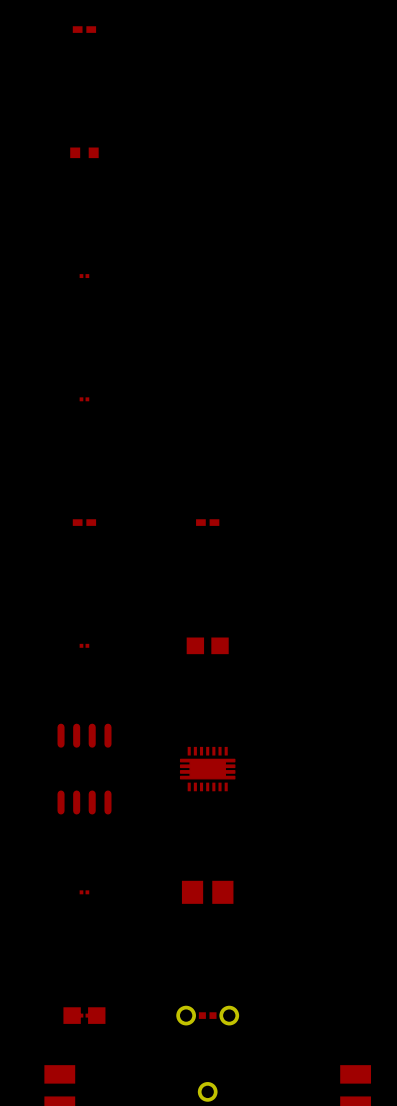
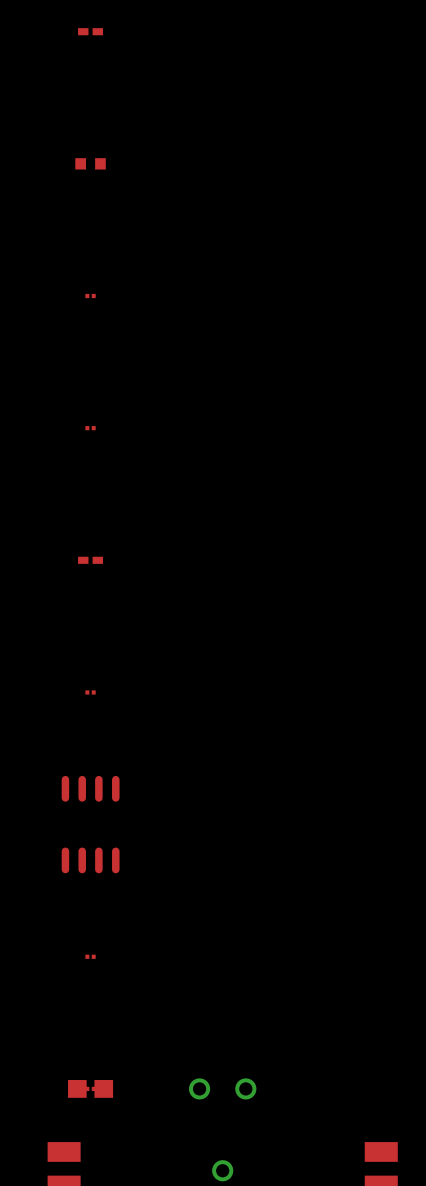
part: (207, 522) -> none
part: (207, 645) -> none
part: (207, 769) -> none
part: (207, 892) -> none
part: (207, 1015) -> none

